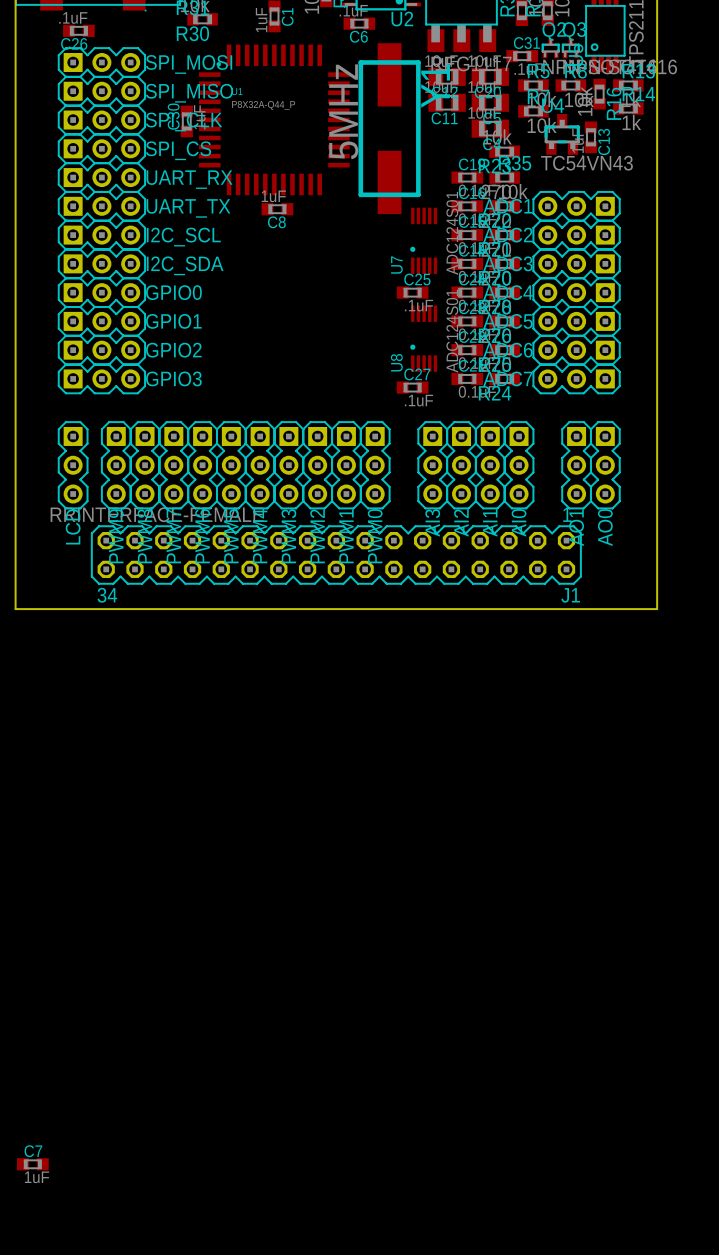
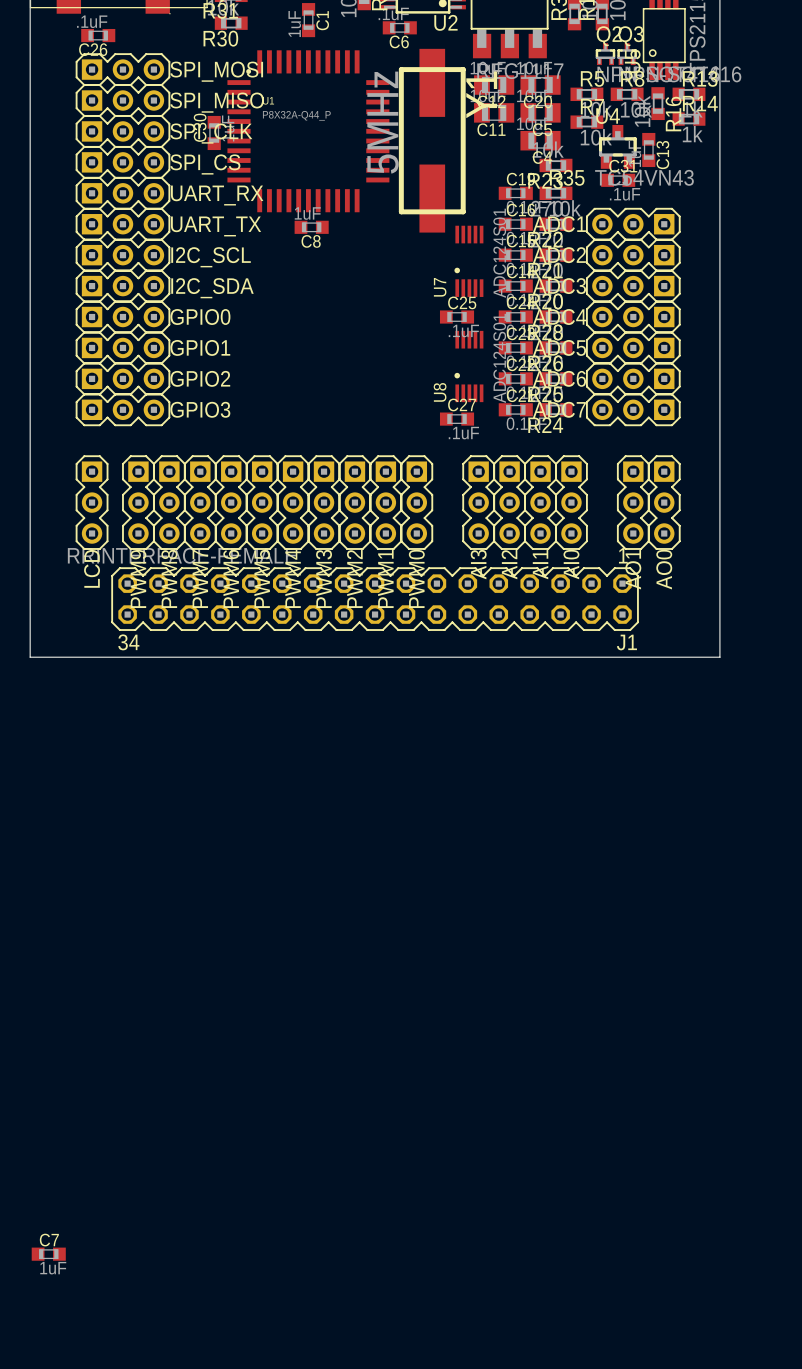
C31 position: (522, 56) -> (618, 180)

